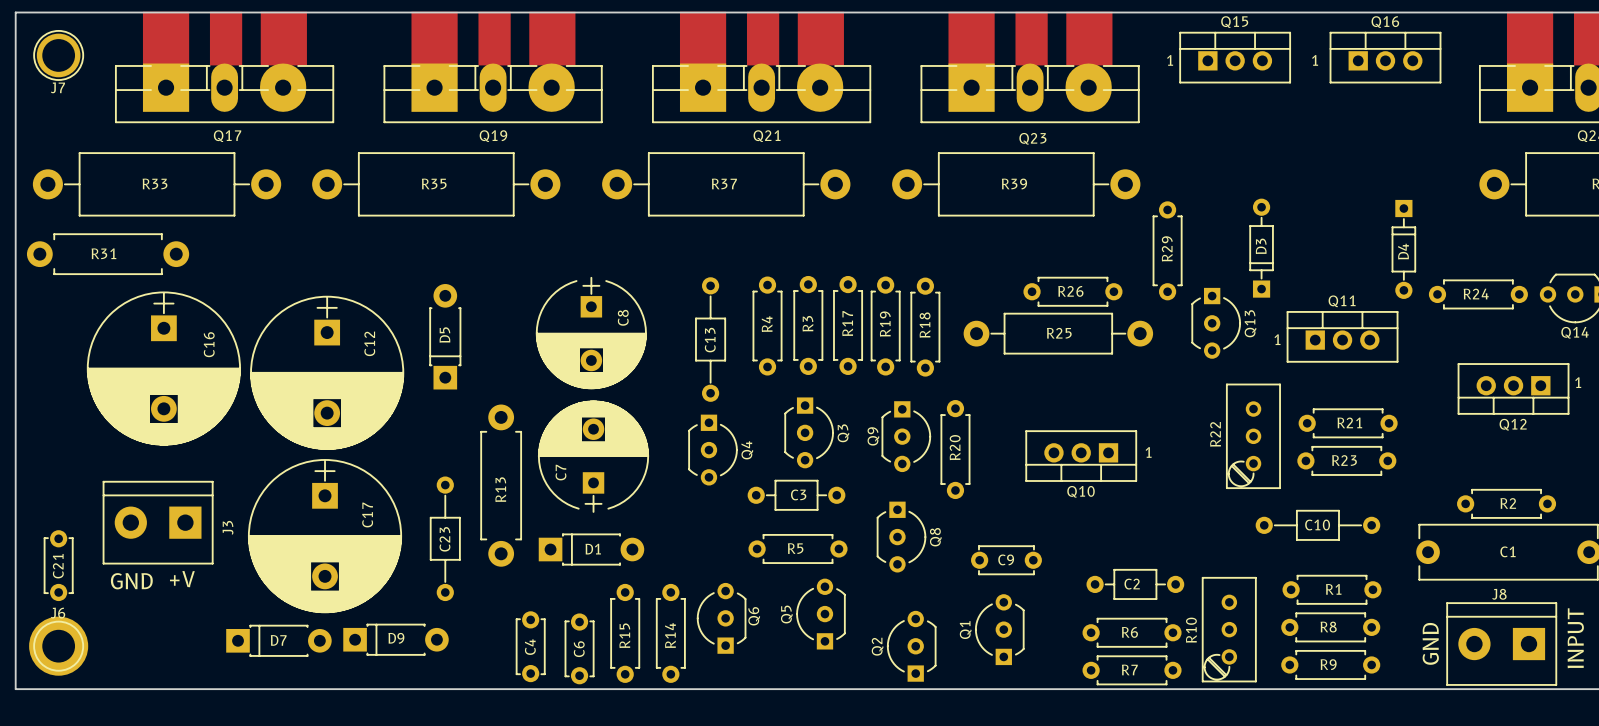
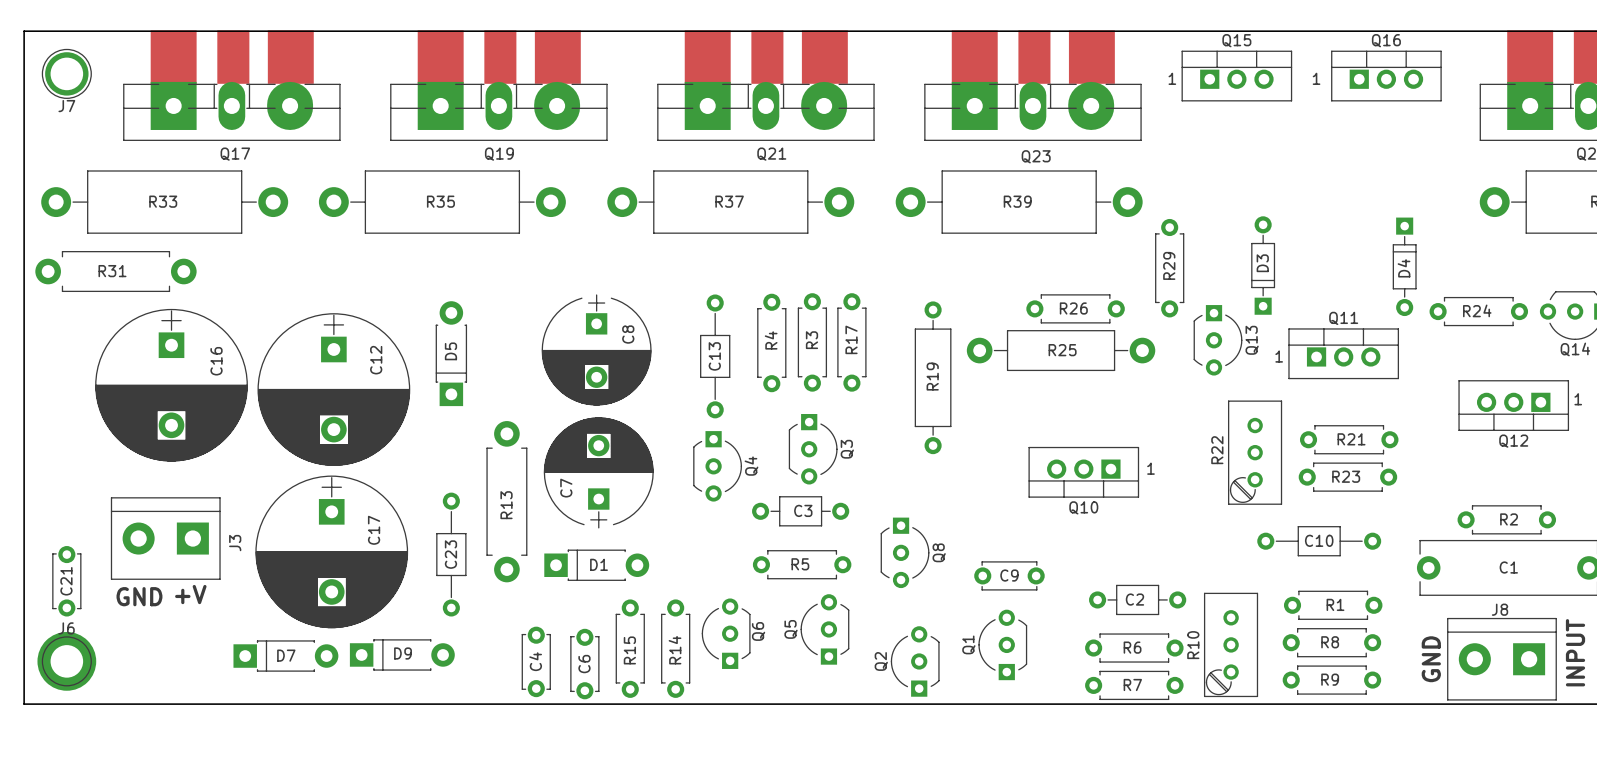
R19 footprint: [870, 276, 901, 376] -> [914, 301, 952, 455]
R18: (925, 327) -> none
Q9: (906, 436) -> none
R20: (955, 449) -> none

